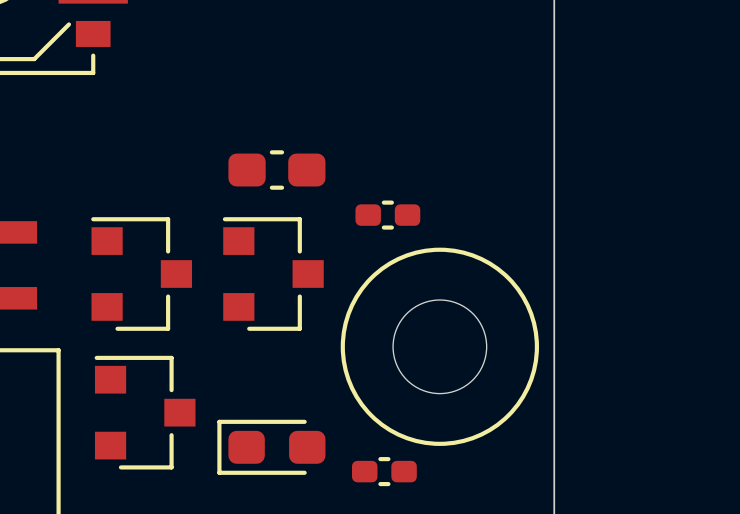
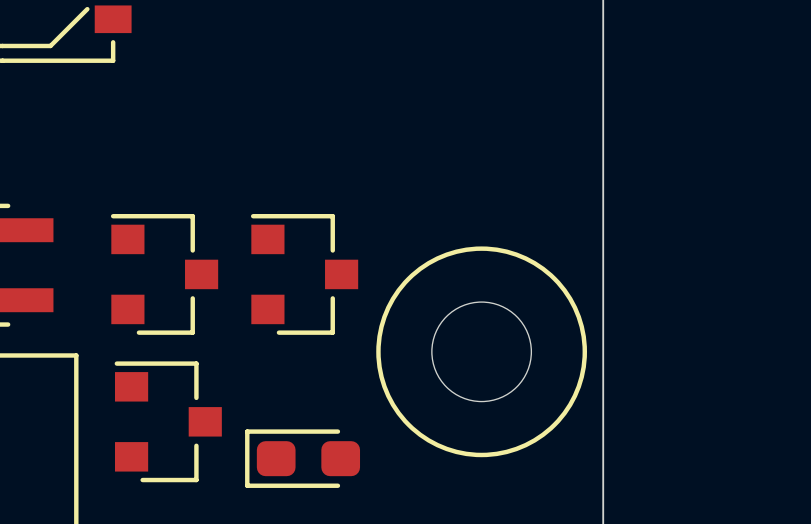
part: (276, 170) -> none
part: (387, 215) -> none
part: (384, 471) -> none

